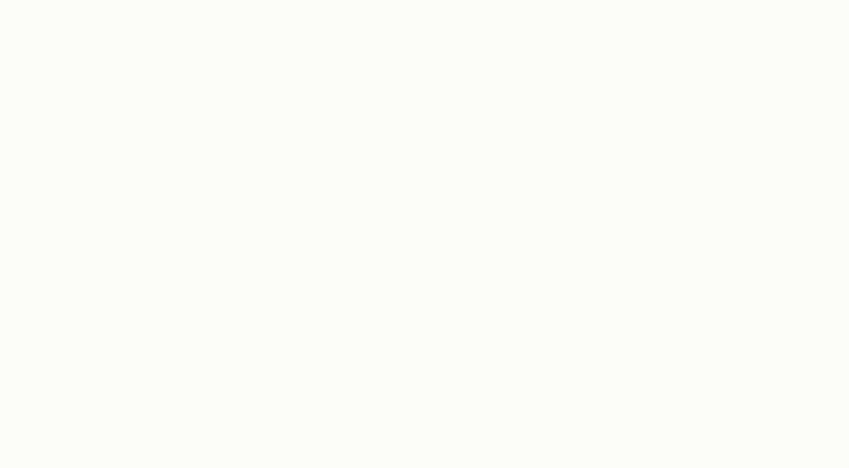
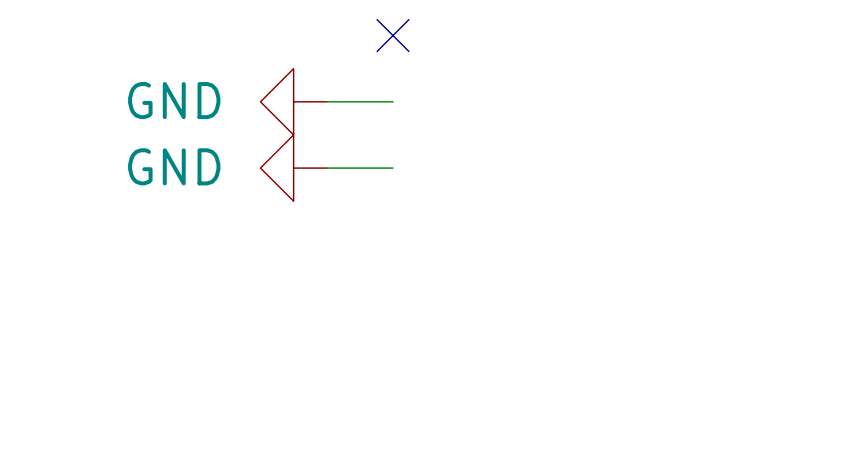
no-connect mark: none -> (393, 35)
power symbol: none -> GND (293, 101)
wire: none -> (326, 101) (393, 101)
power symbol: none -> GND (293, 168)
wire: none -> (326, 168) (393, 168)

